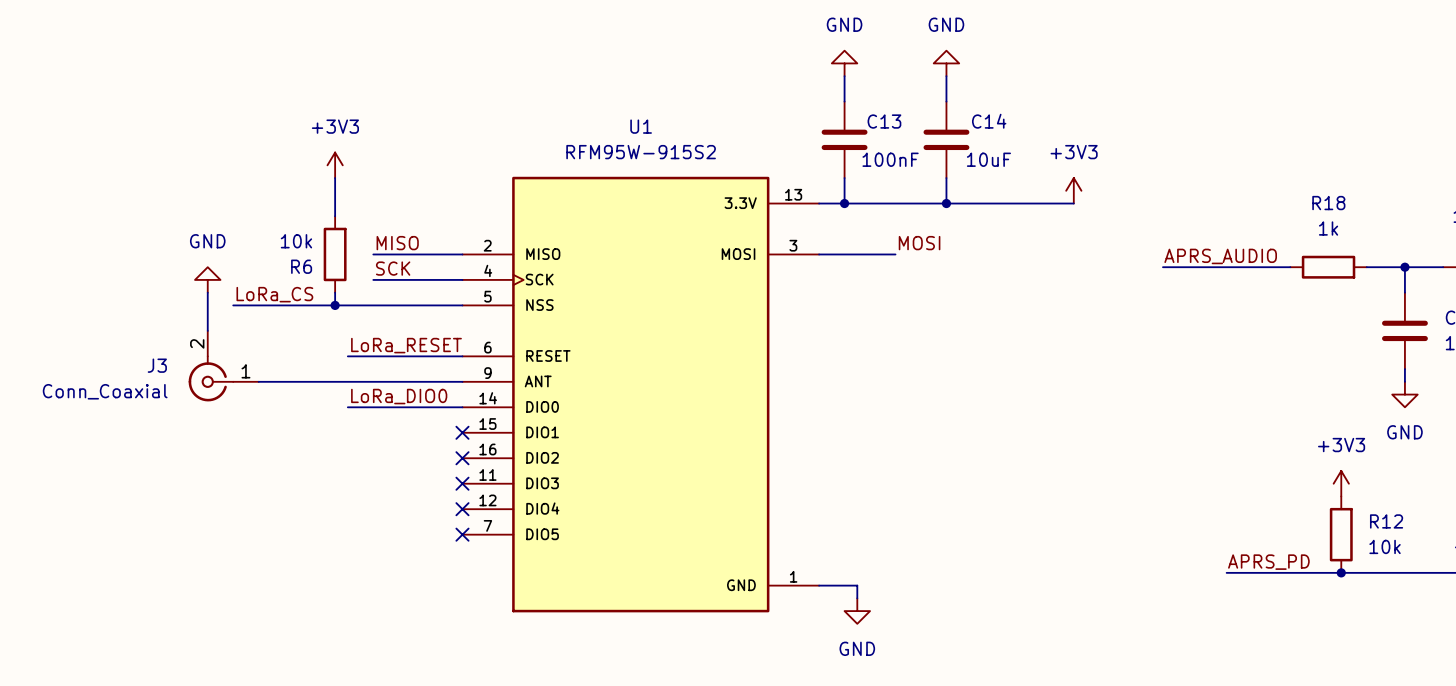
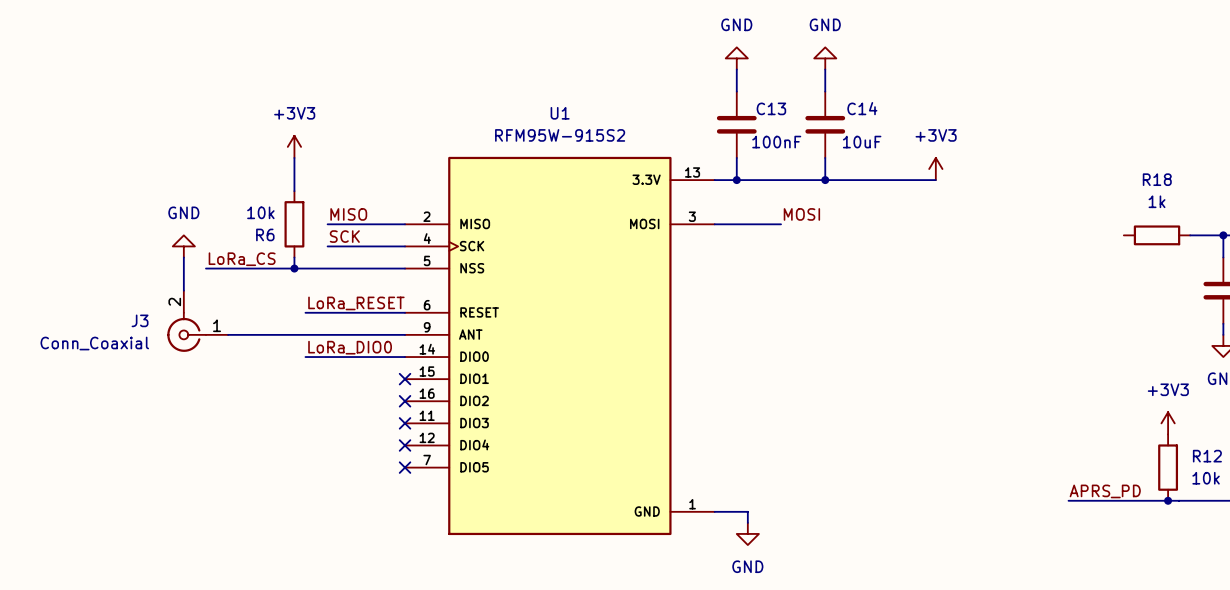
label: APRS_AUDIO (1220, 256) -> none
wire: (1162, 267) (1290, 267) -> none

